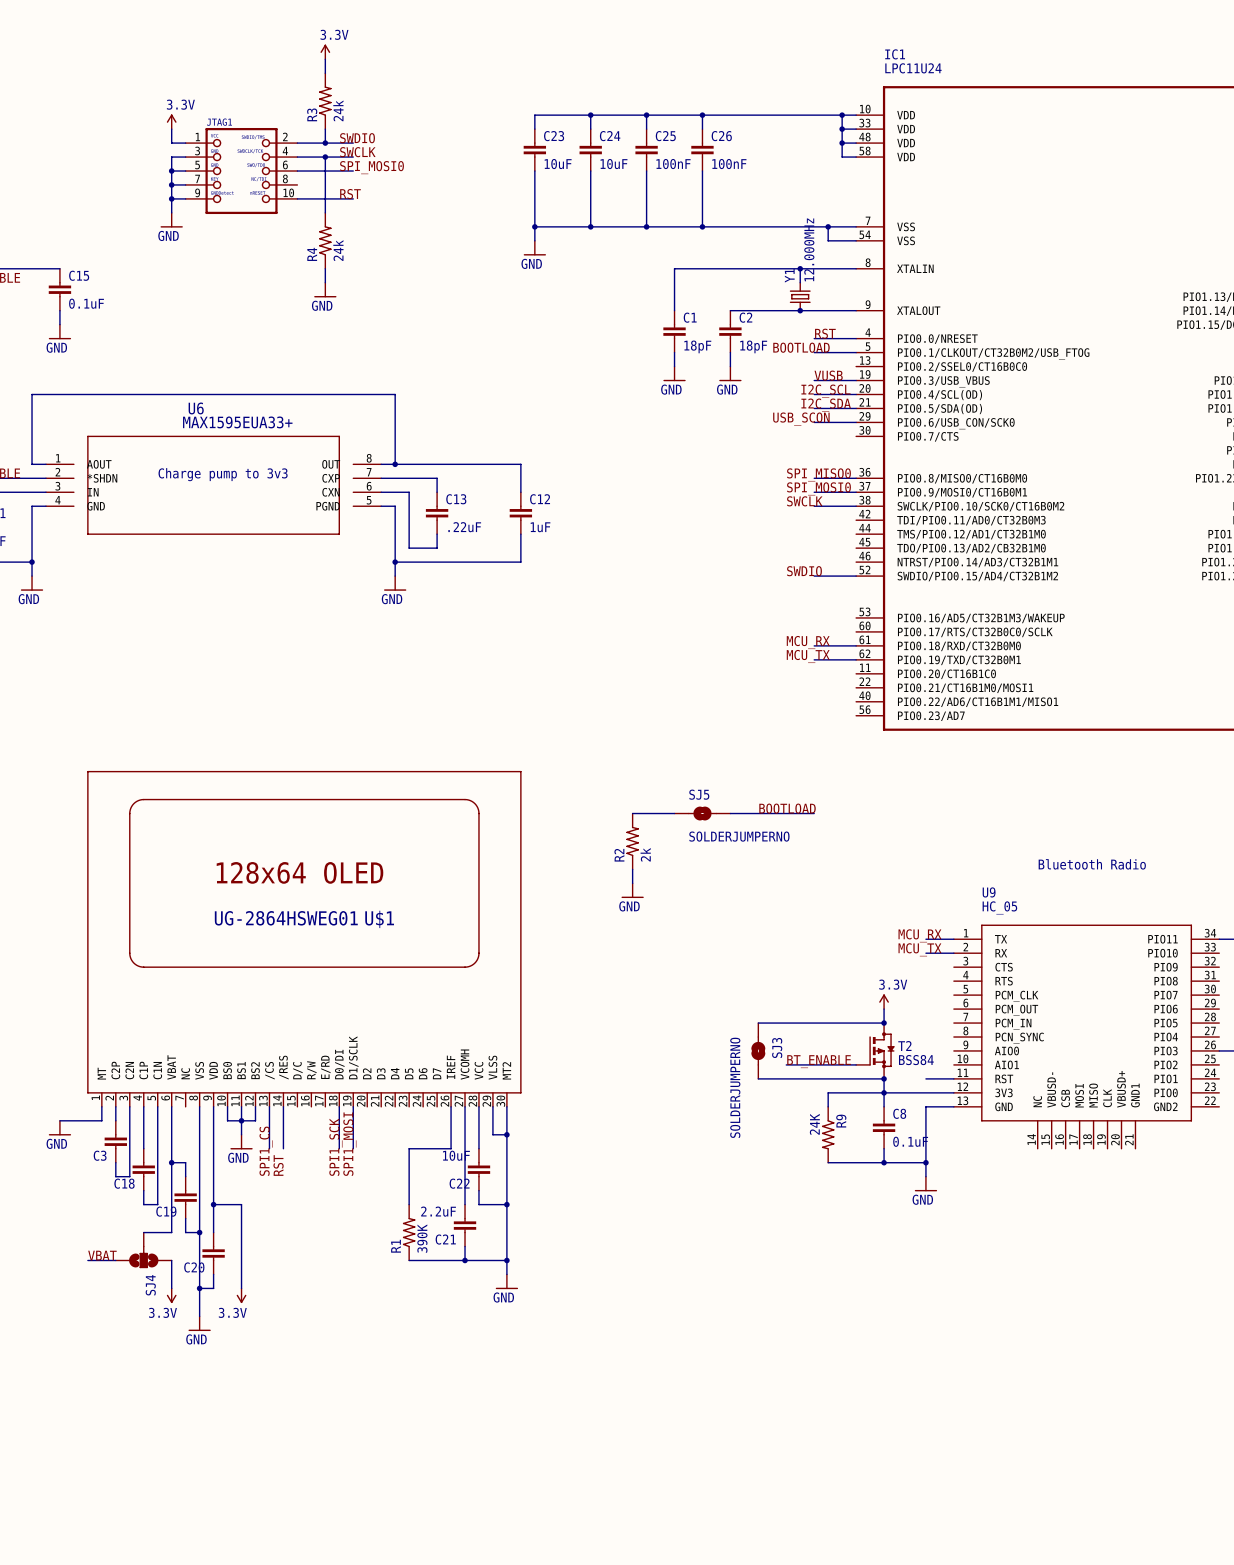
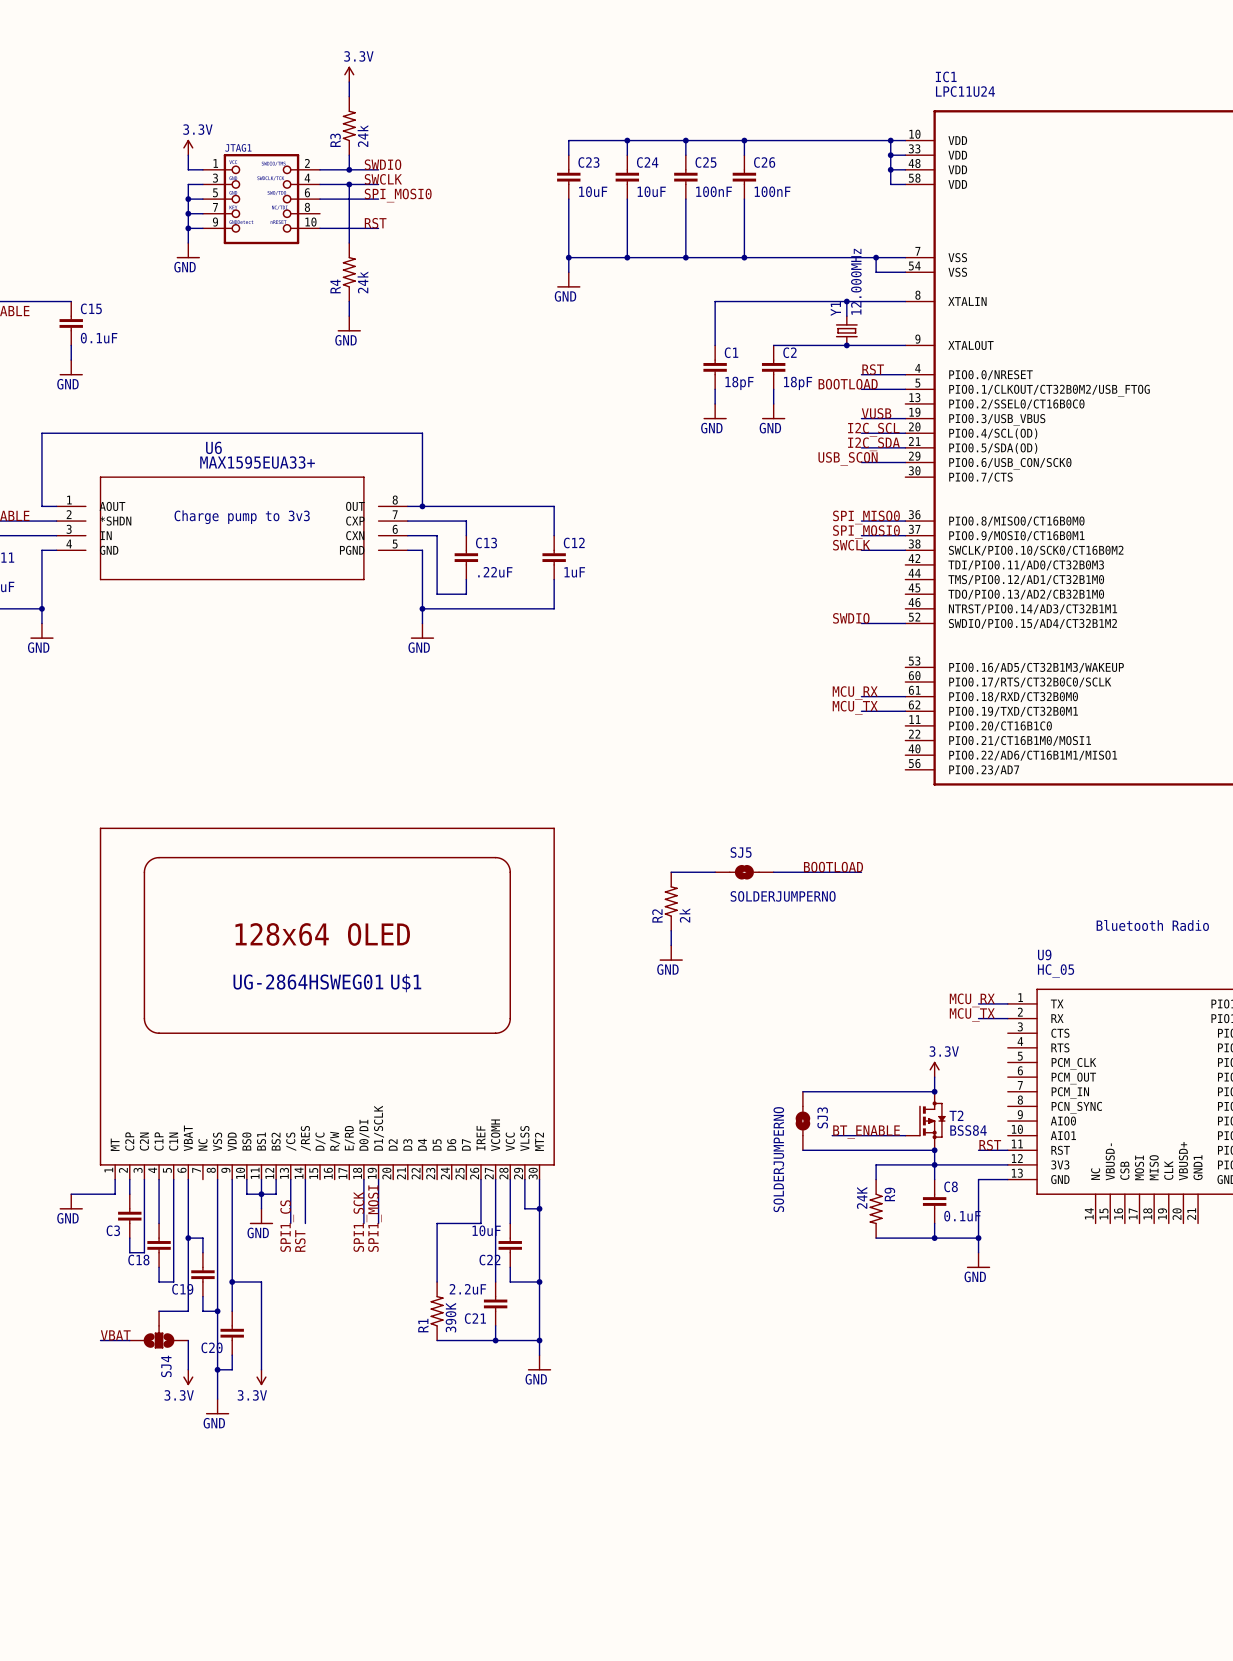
label: none -> RST (990, 1145)

